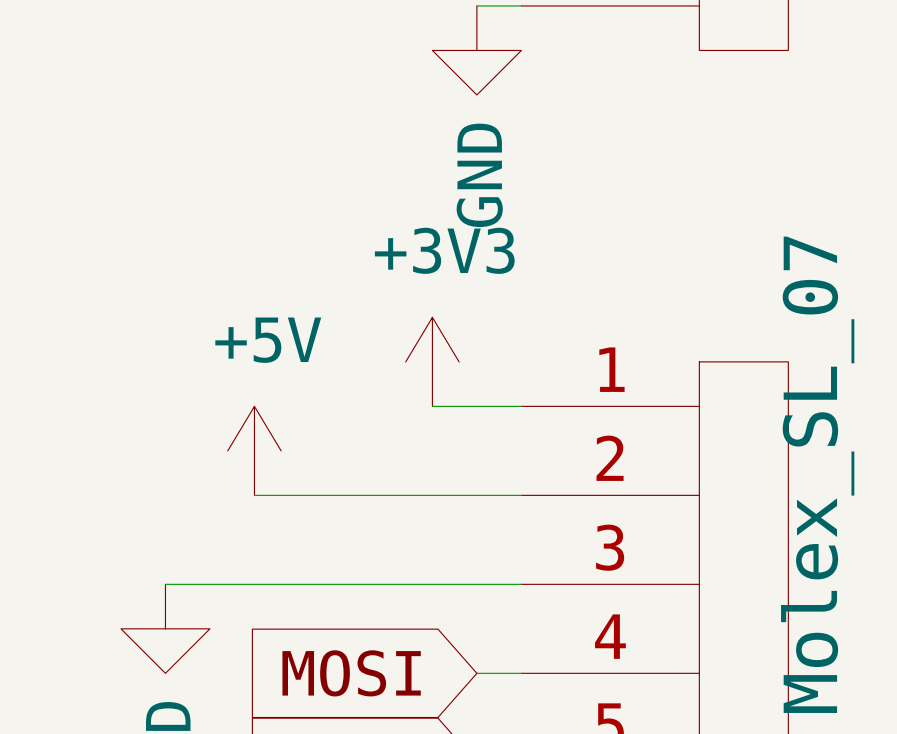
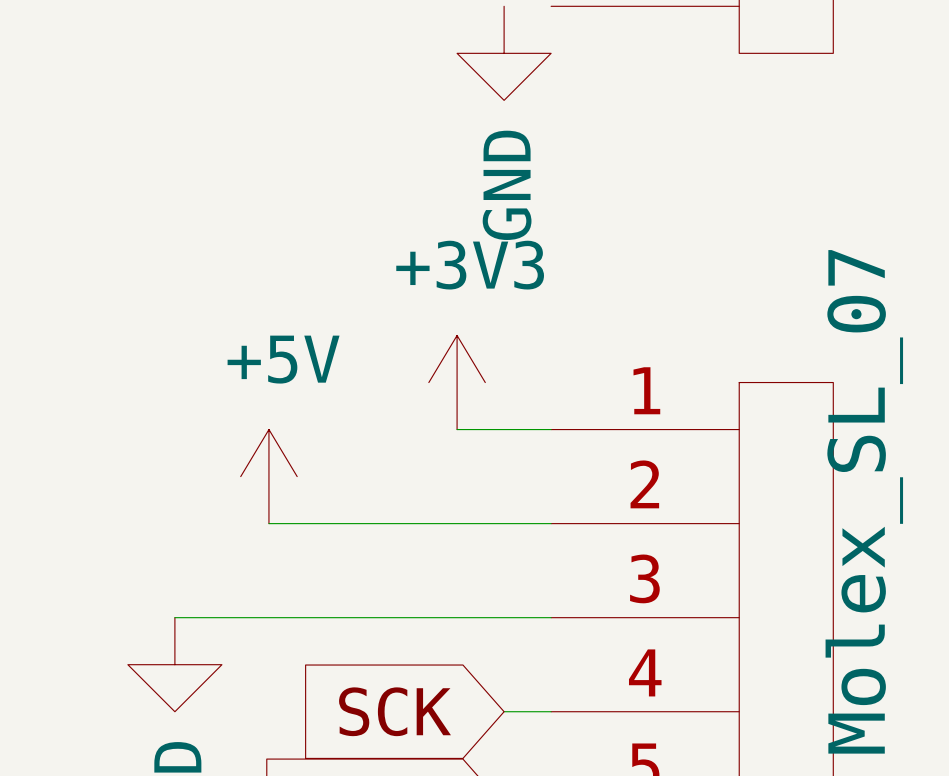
wire: (476, 5) (521, 5) -> none
global label: MOSI (351, 673) -> SCK (395, 711)

